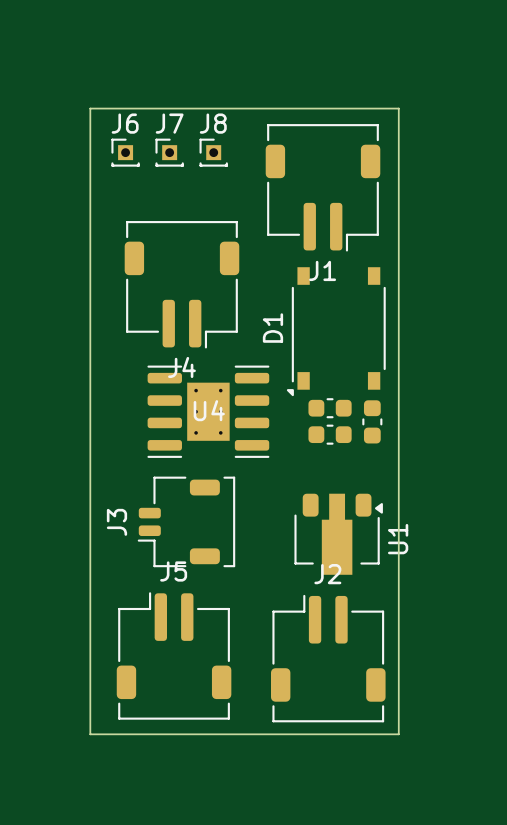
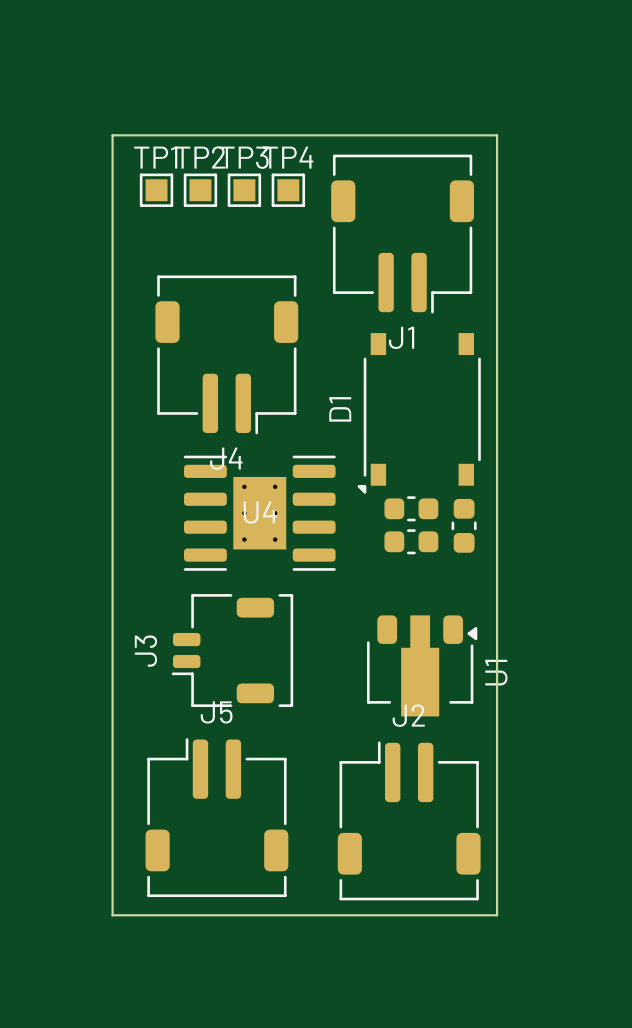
J6: (125, 152) -> none
TP1: none -> (156, 190)
TP2: none -> (200, 190)
J7: (169, 152) -> none
TP3: none -> (244, 190)
J8: (213, 152) -> none
TP4: none -> (288, 190)

